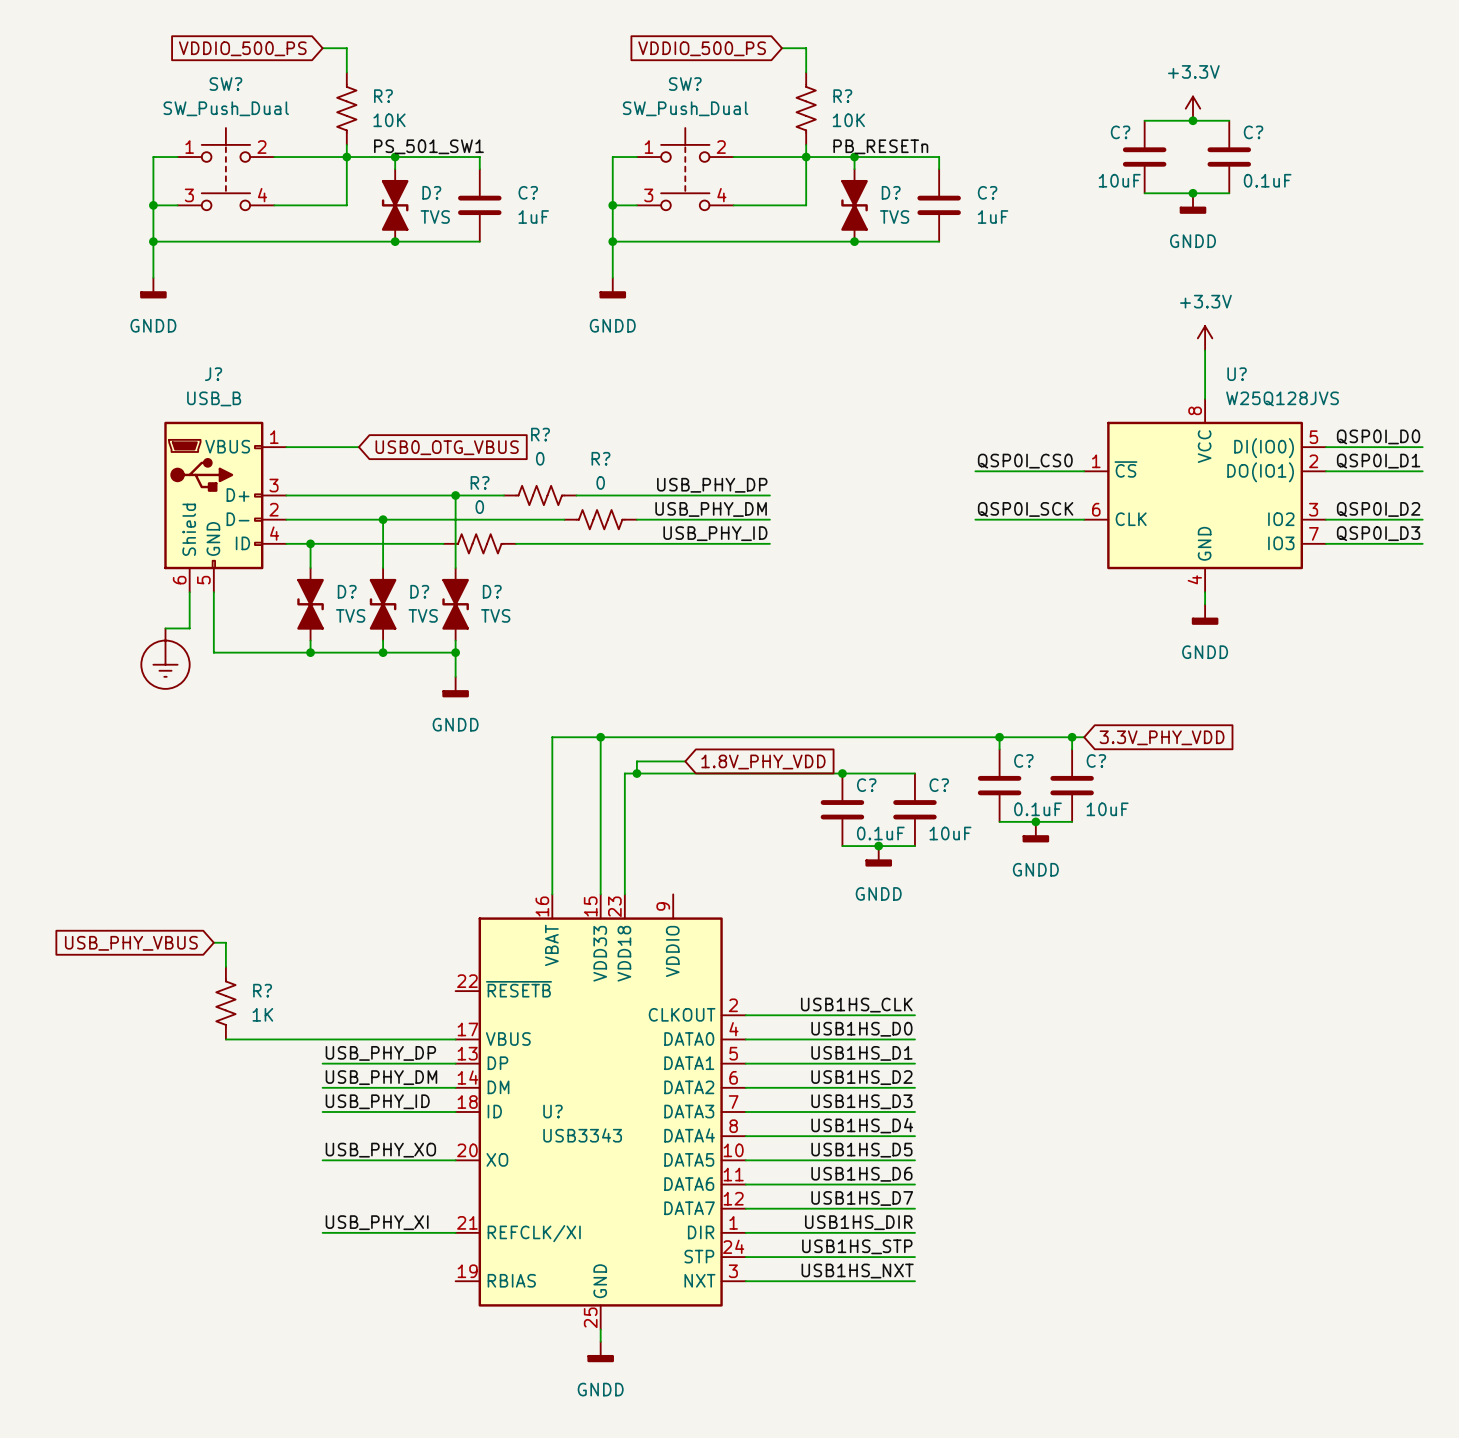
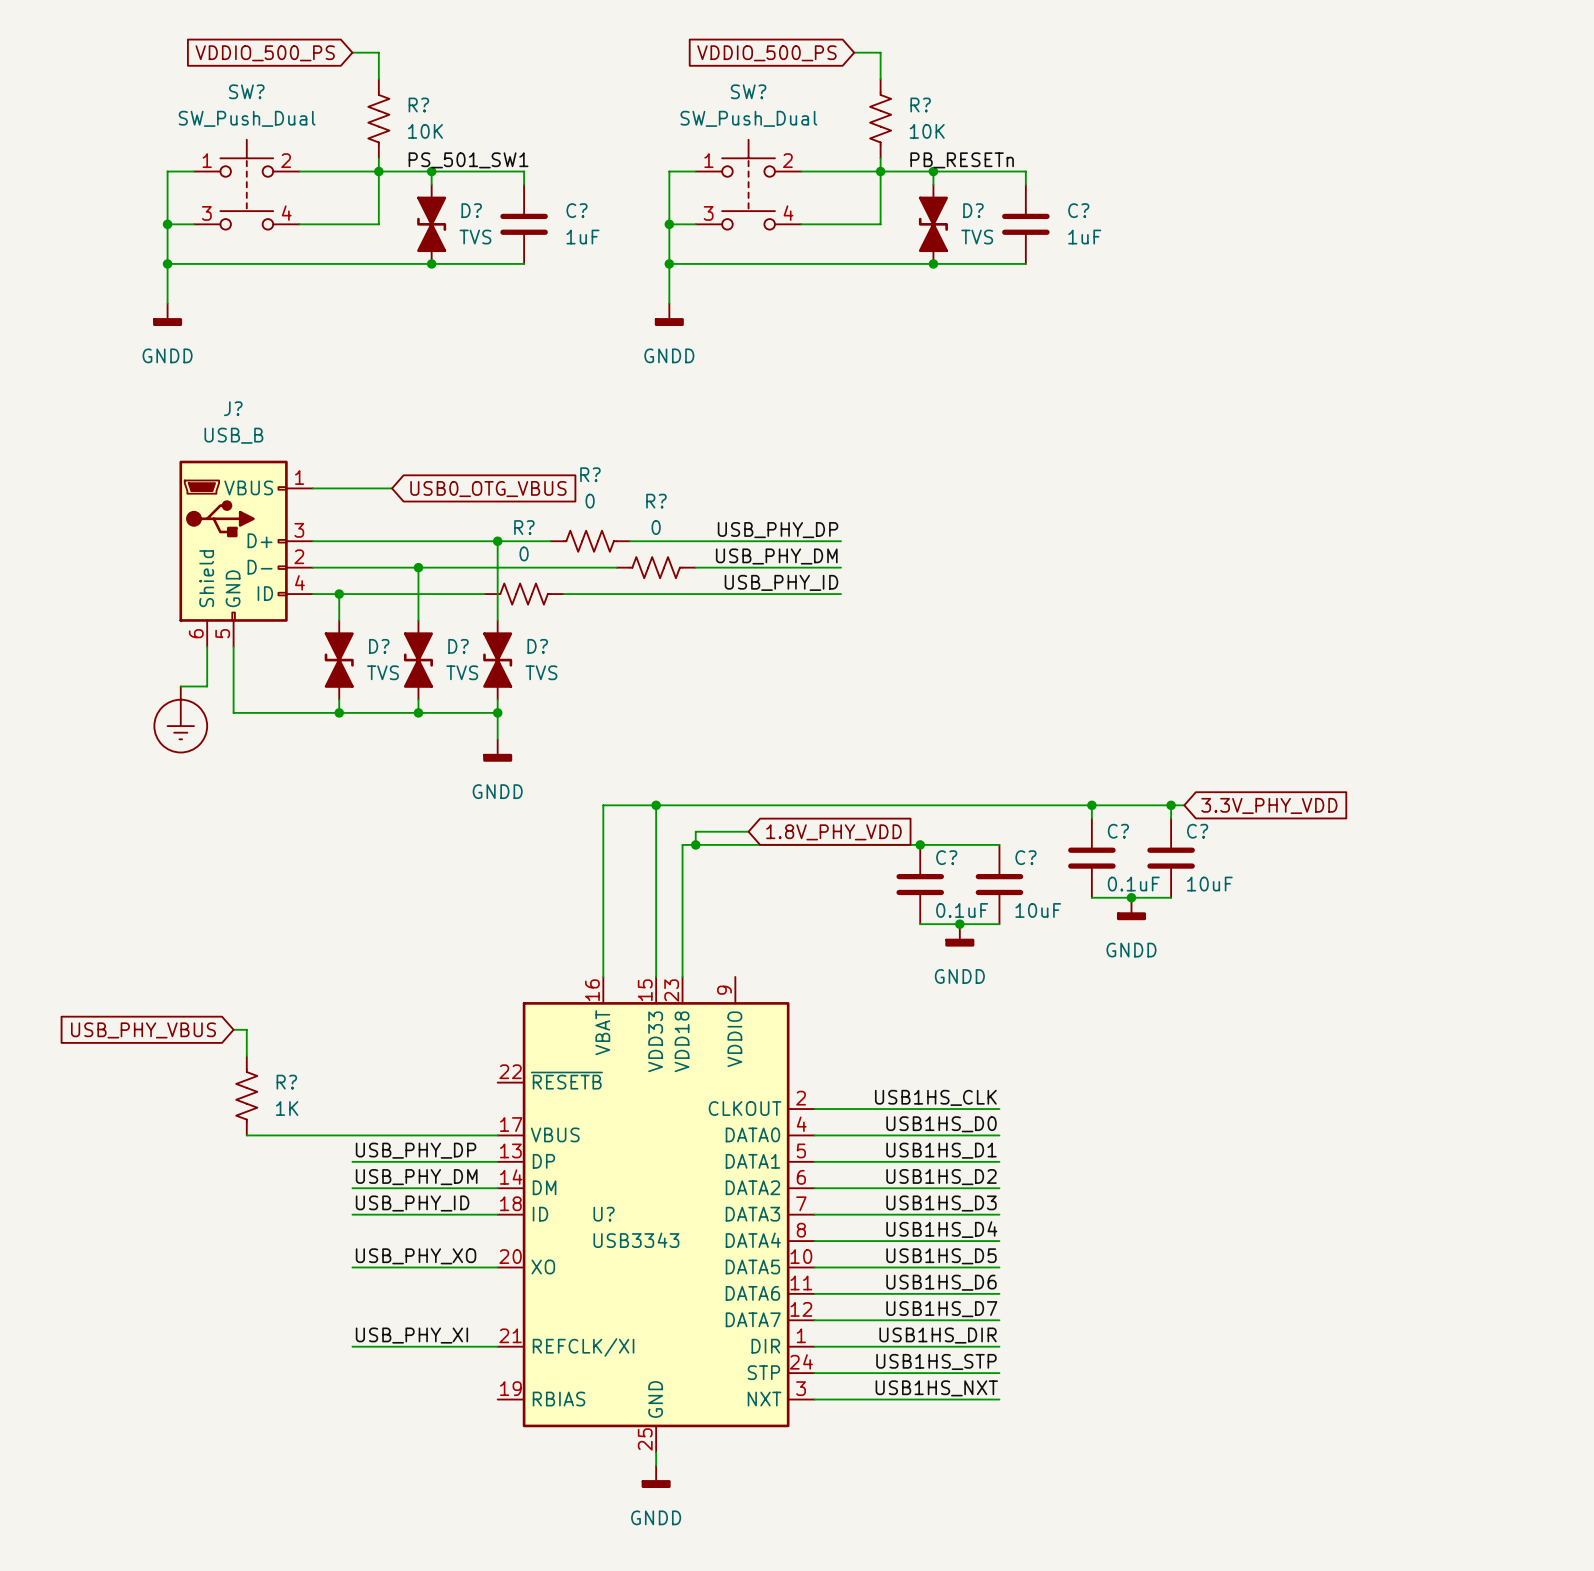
power symbol: +3.3V (1193, 108) -> none
wire: (1144, 120) (1229, 120) -> none
junction: (1193, 120) -> none
C?: 10uF (1144, 157) -> none
C?: 0.1uF (1229, 157) -> none
wire: (1144, 193) (1229, 193) -> none
junction: (1193, 193) -> none
power symbol: GNDD (1193, 203) -> none
power symbol: +3.3V (1205, 338) -> none
wire: (1205, 350) (1205, 398) -> none
label: QSP0I_D0 (1378, 436) -> none
wire: (1325, 447) (1422, 447) -> none
label: QSP0I_CS0 (1025, 461) -> none
label: QSP0I_D1 (1378, 461) -> none
wire: (975, 471) (1084, 471) -> none
wire: (1325, 471) (1422, 471) -> none
U?: W25Q128JVS (1205, 495) -> none
label: QSP0I_SCK (1025, 509) -> none
label: QSP0I_D2 (1378, 509) -> none
wire: (975, 519) (1084, 519) -> none
wire: (1325, 519) (1422, 519) -> none
label: QSP0I_D3 (1378, 533) -> none
wire: (1325, 543) (1422, 543) -> none
wire: (1205, 592) (1205, 604) -> none
power symbol: GNDD (1205, 614) -> none

